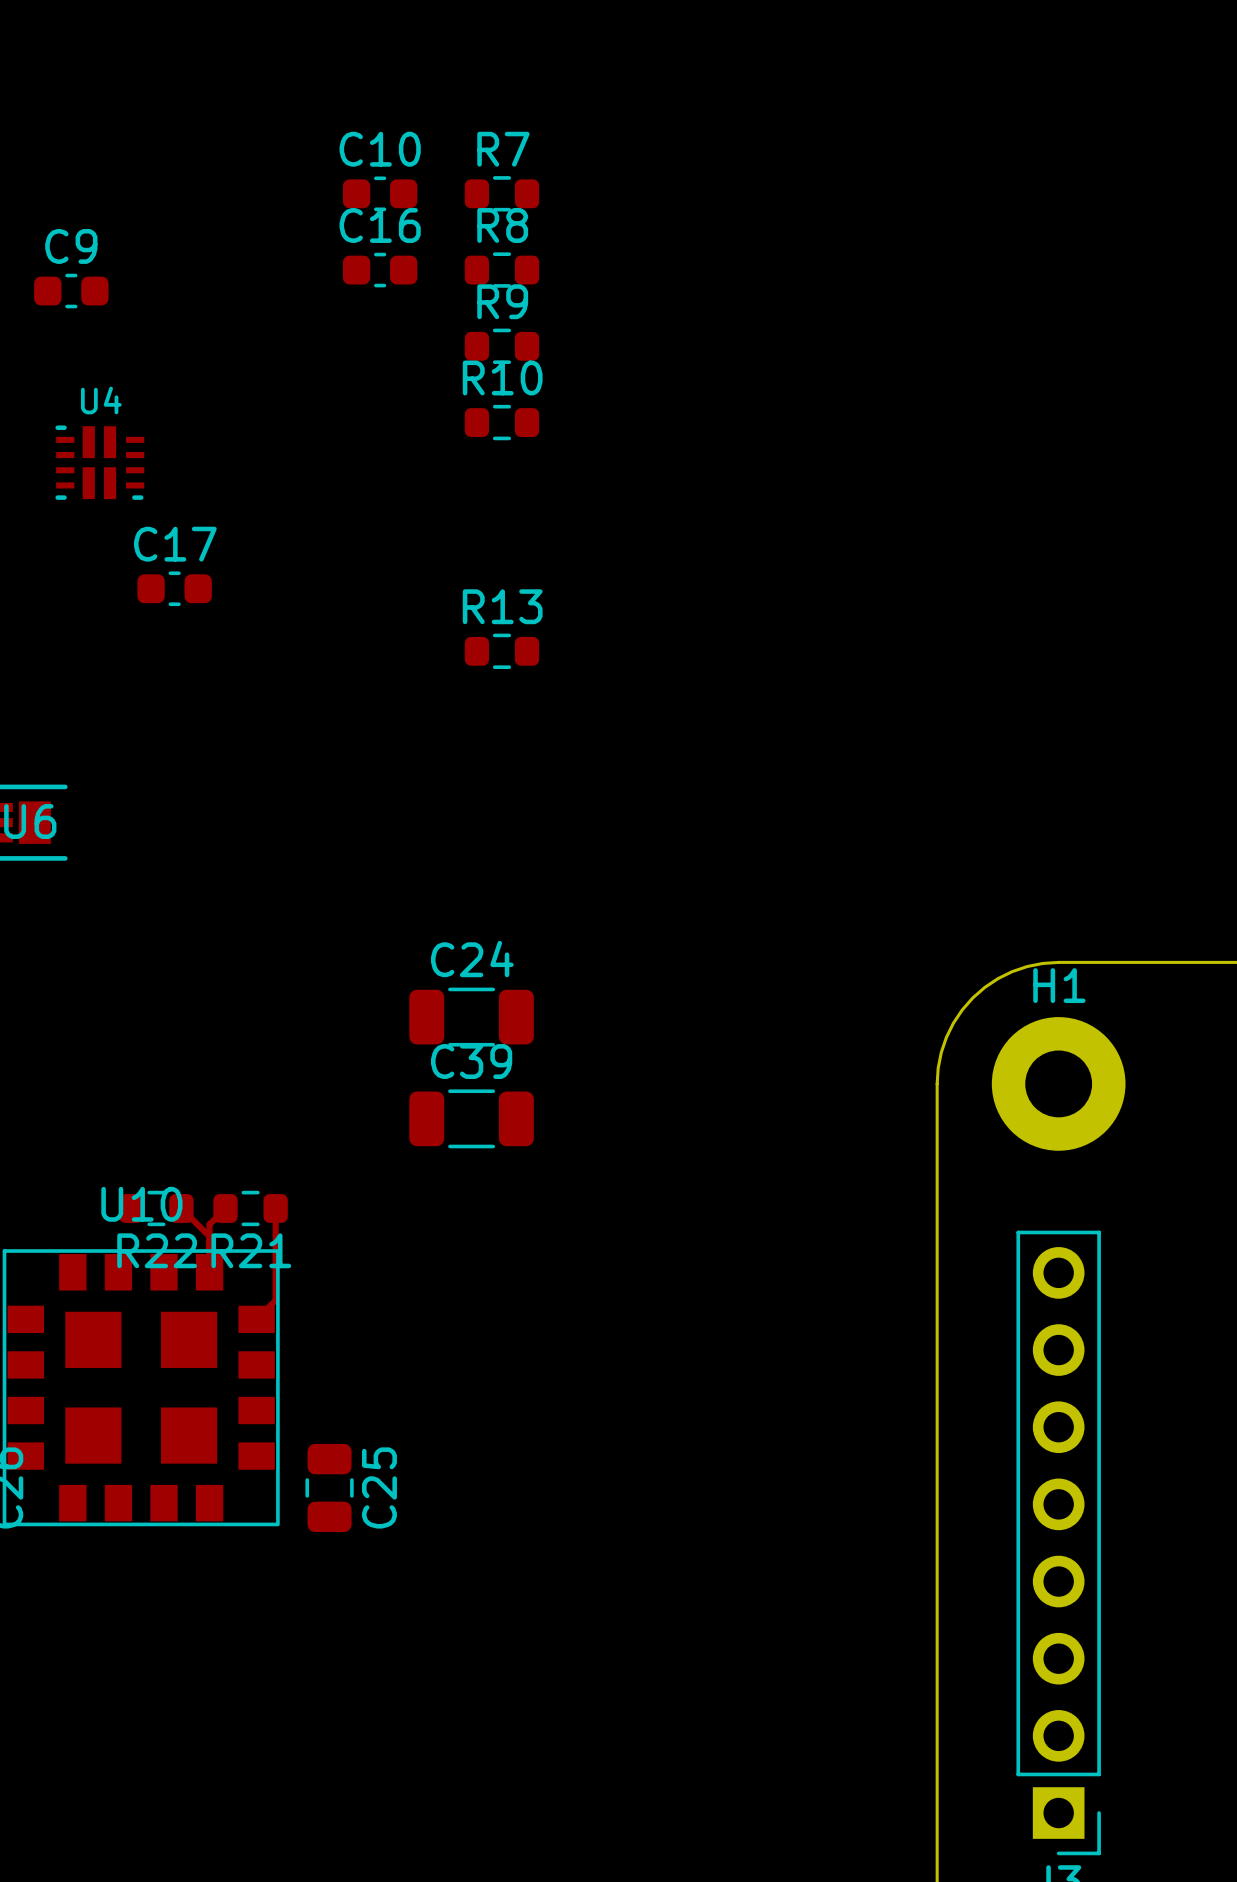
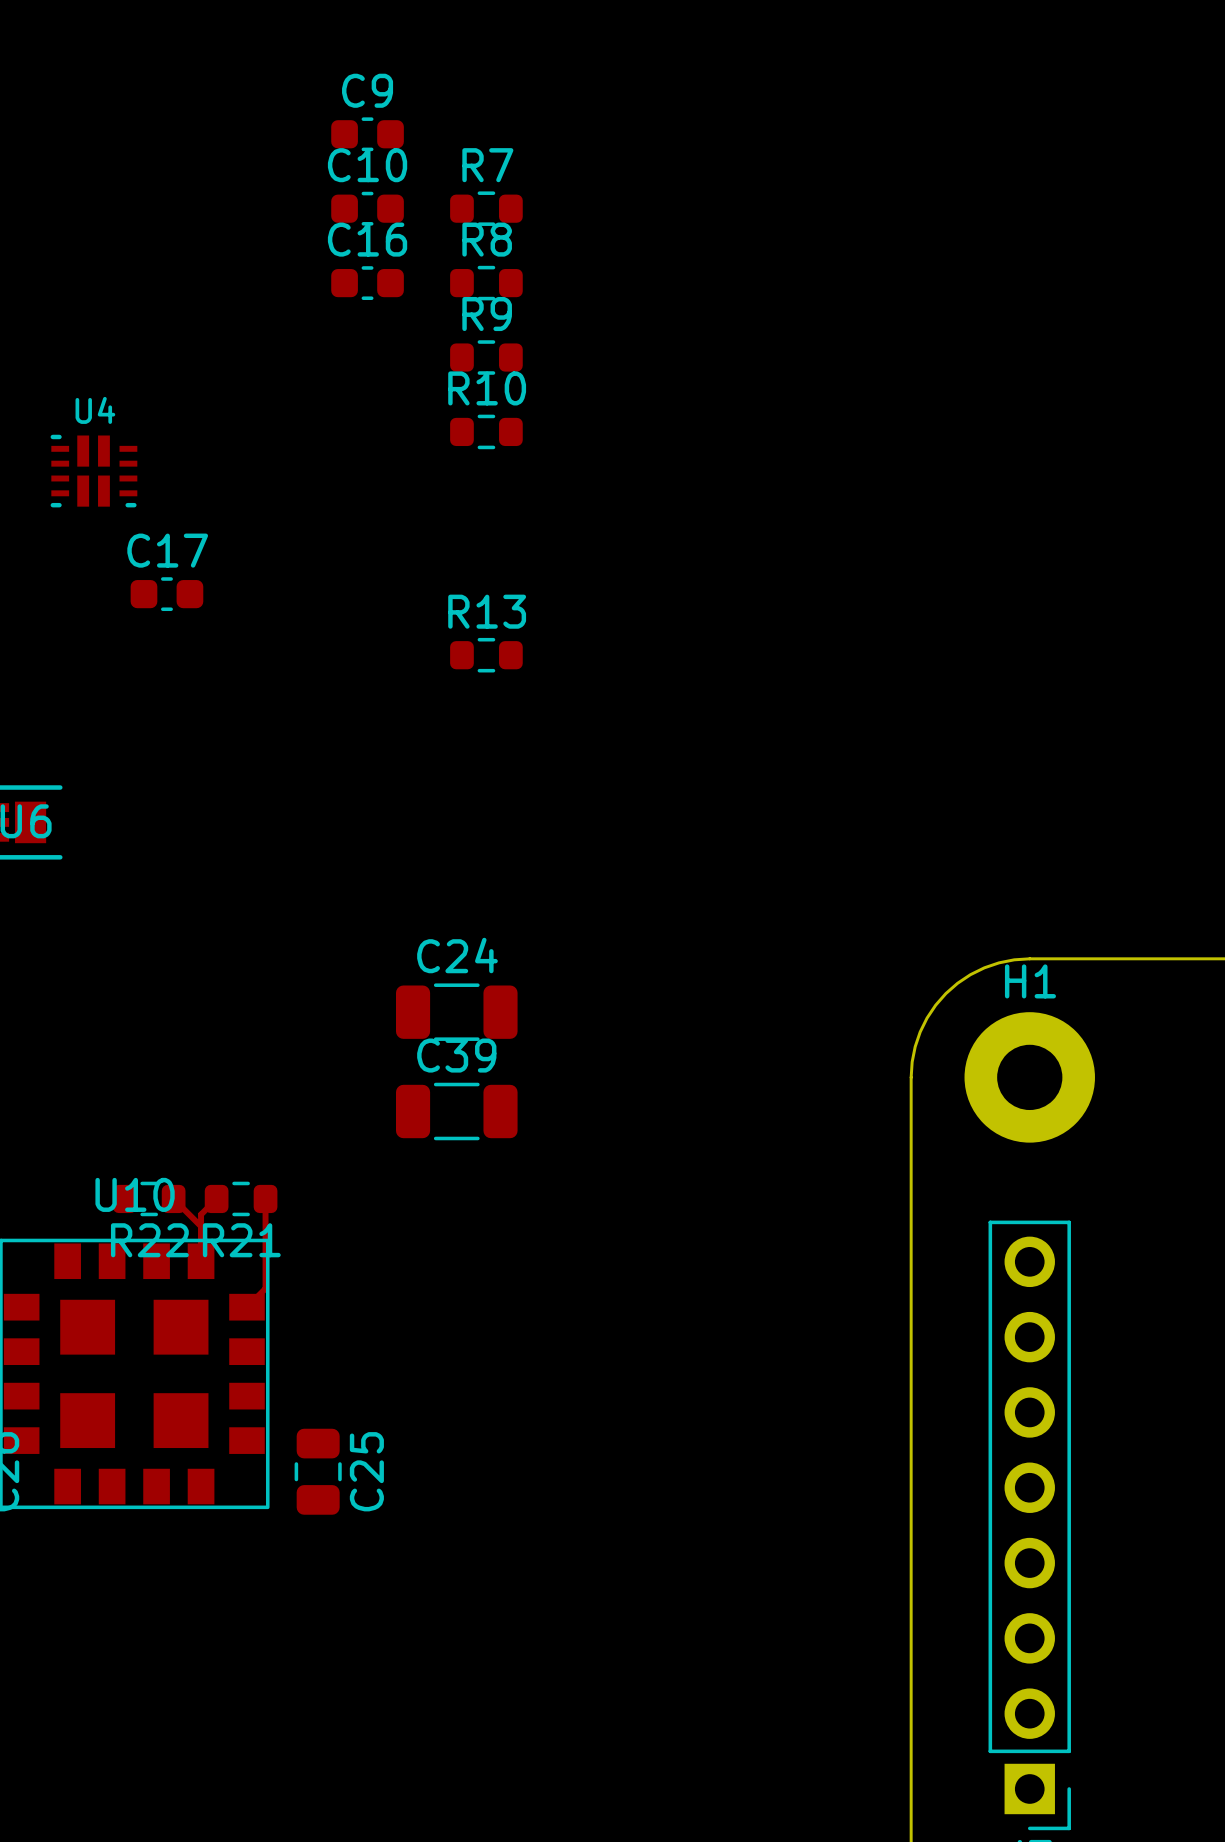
C9 position: (71, 291) -> (367, 134)

